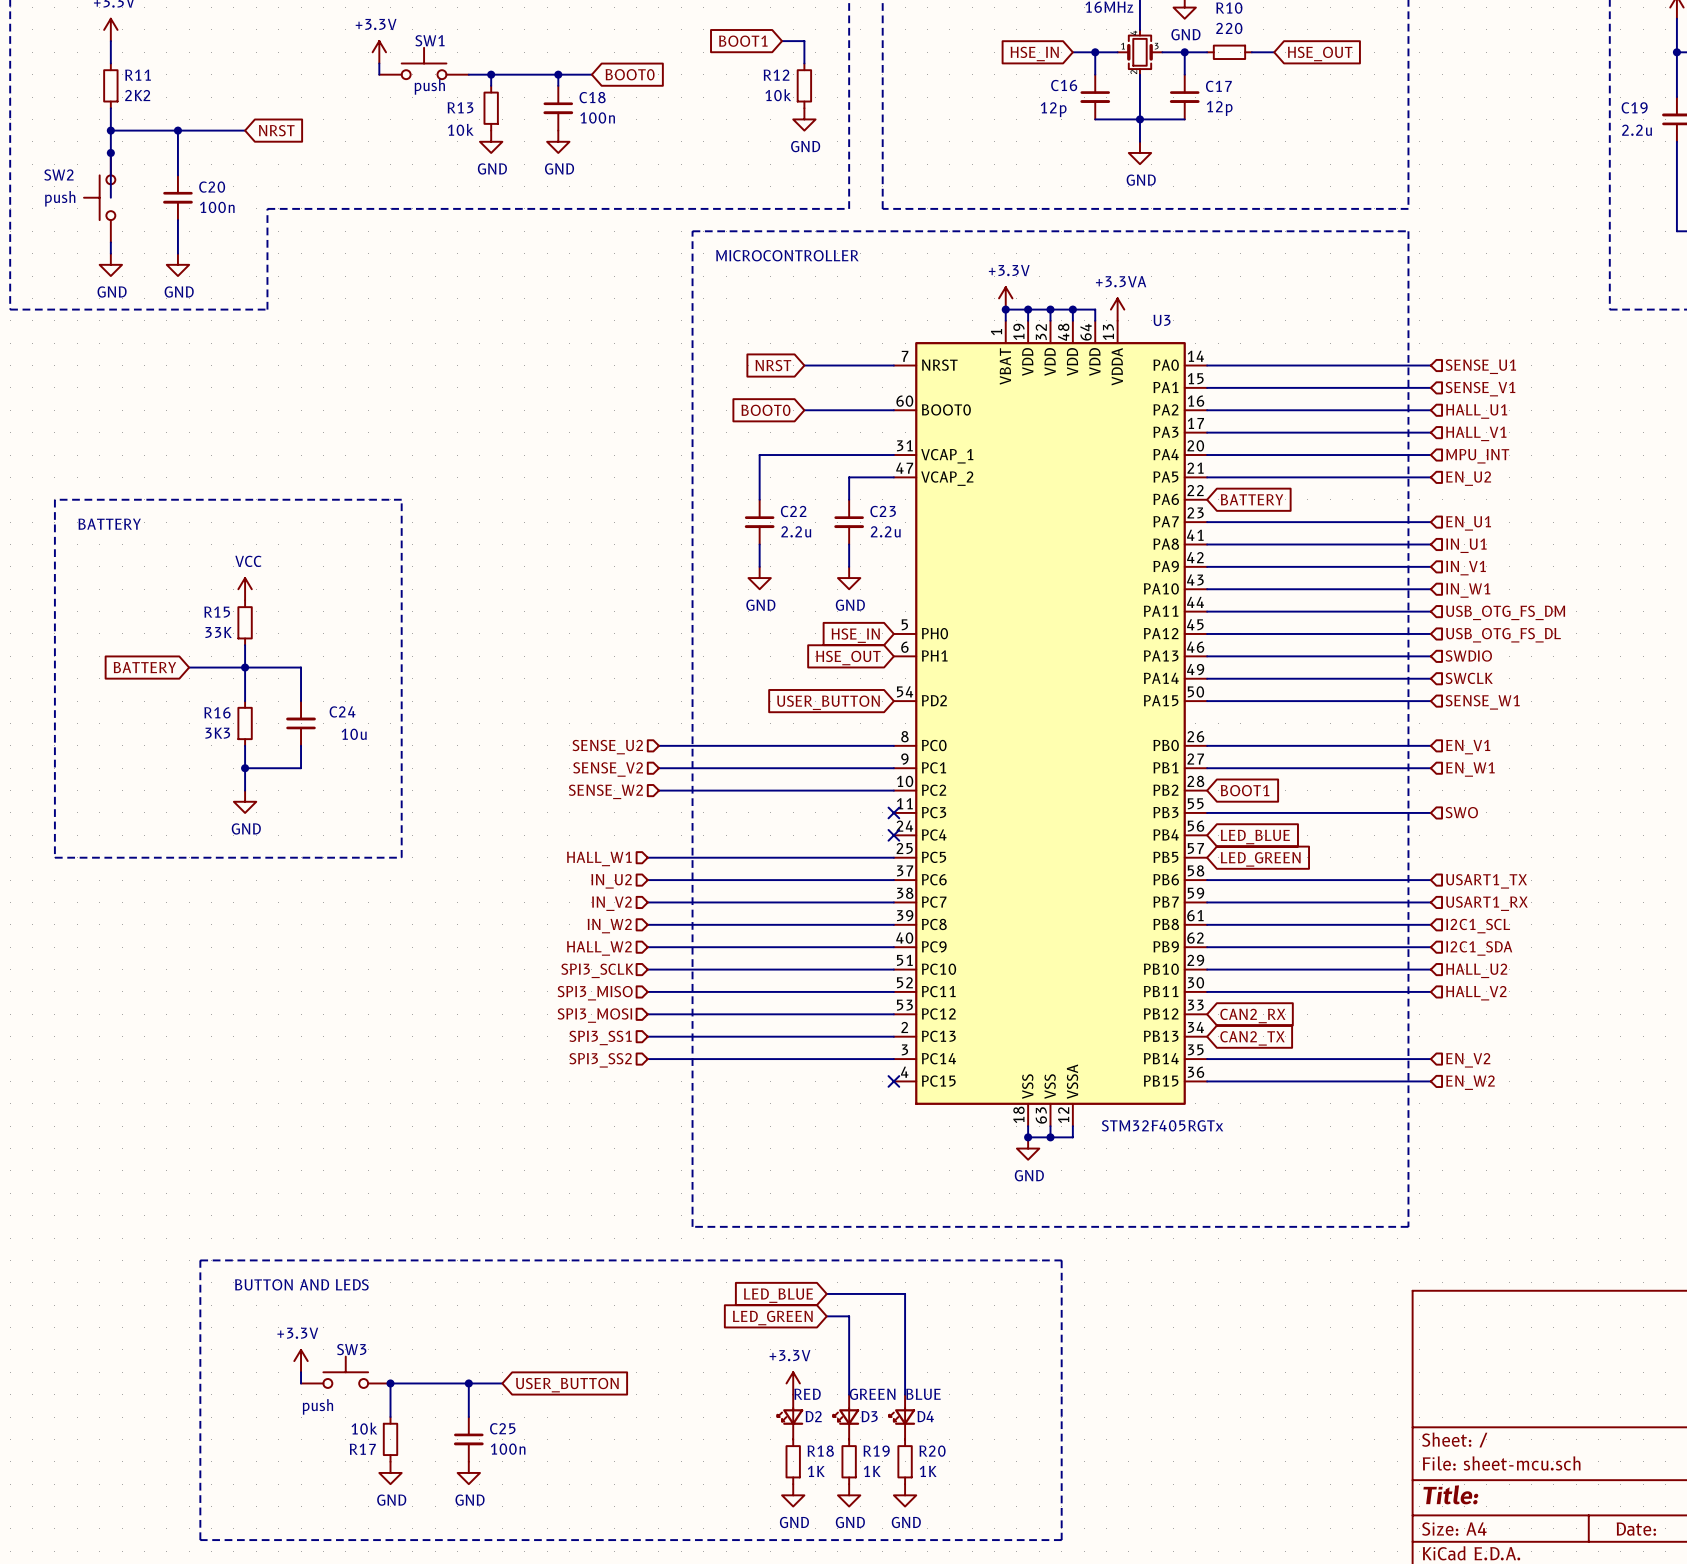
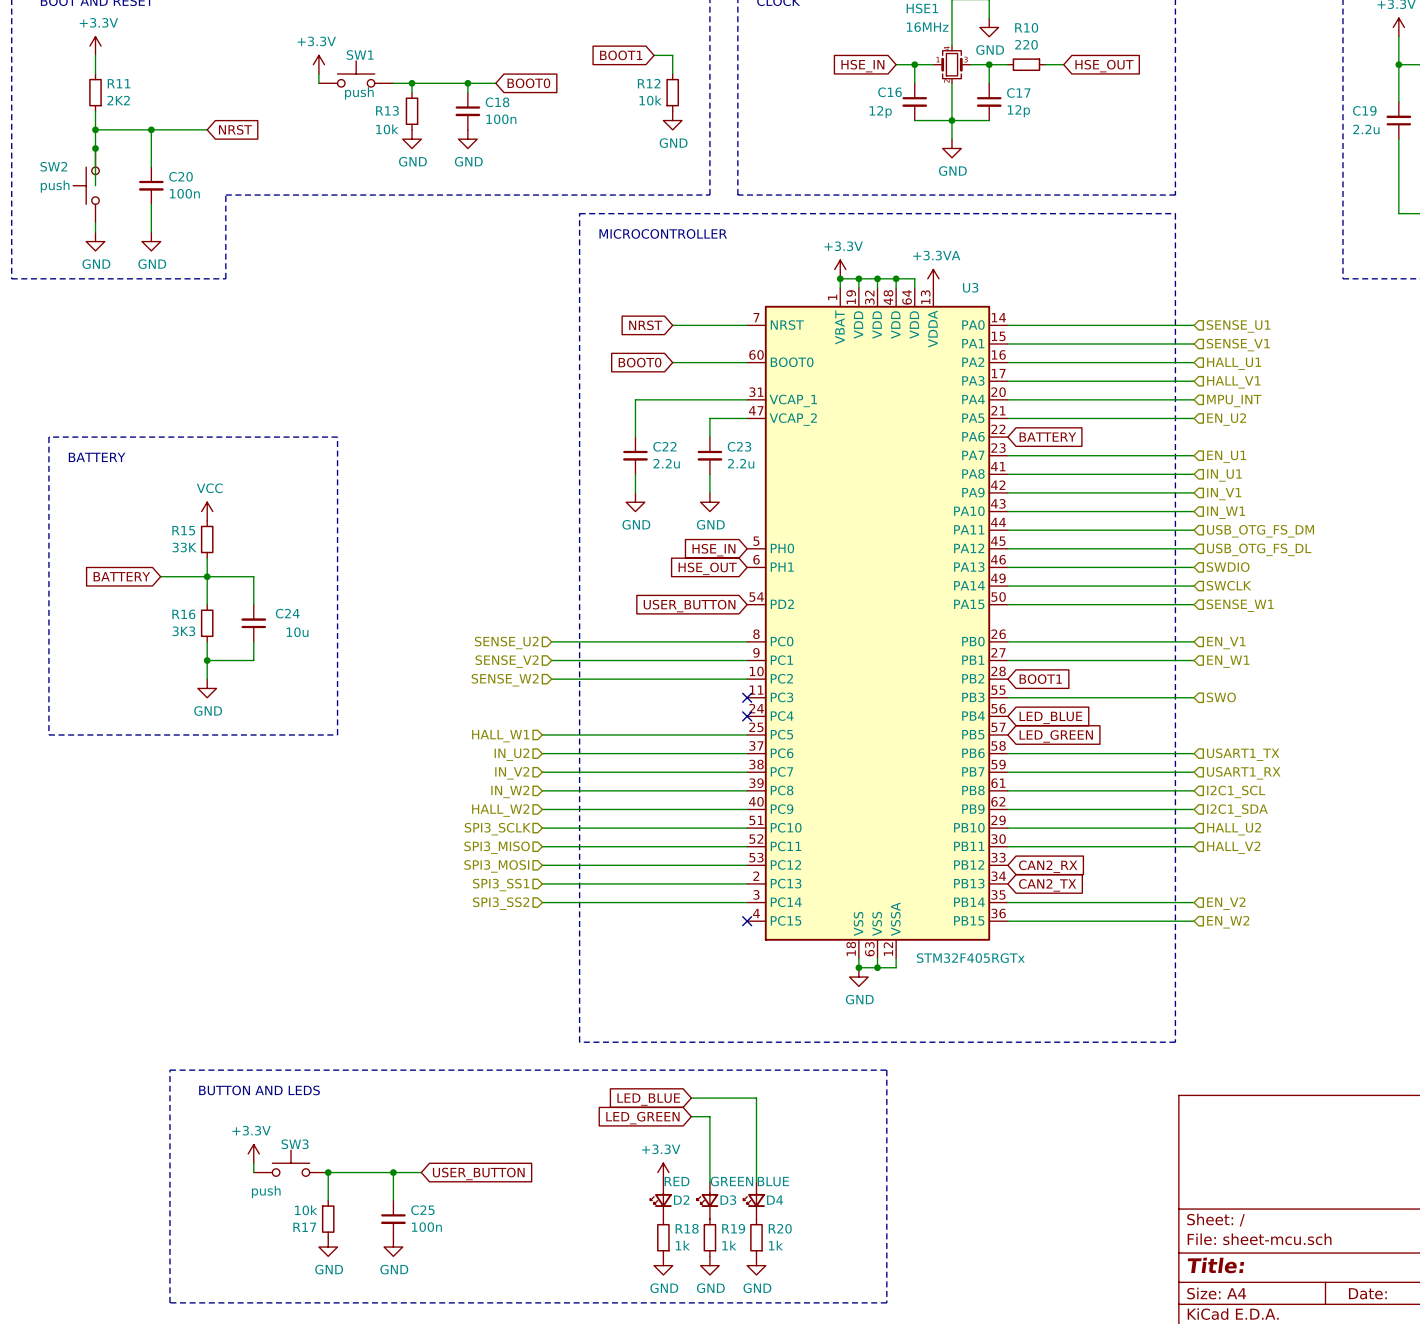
R18 value: 1K (816, 1471) -> 1k (682, 1245)
R19 value: 1K (872, 1471) -> 1k (729, 1245)
R20 value: 1K (928, 1471) -> 1k (775, 1245)

